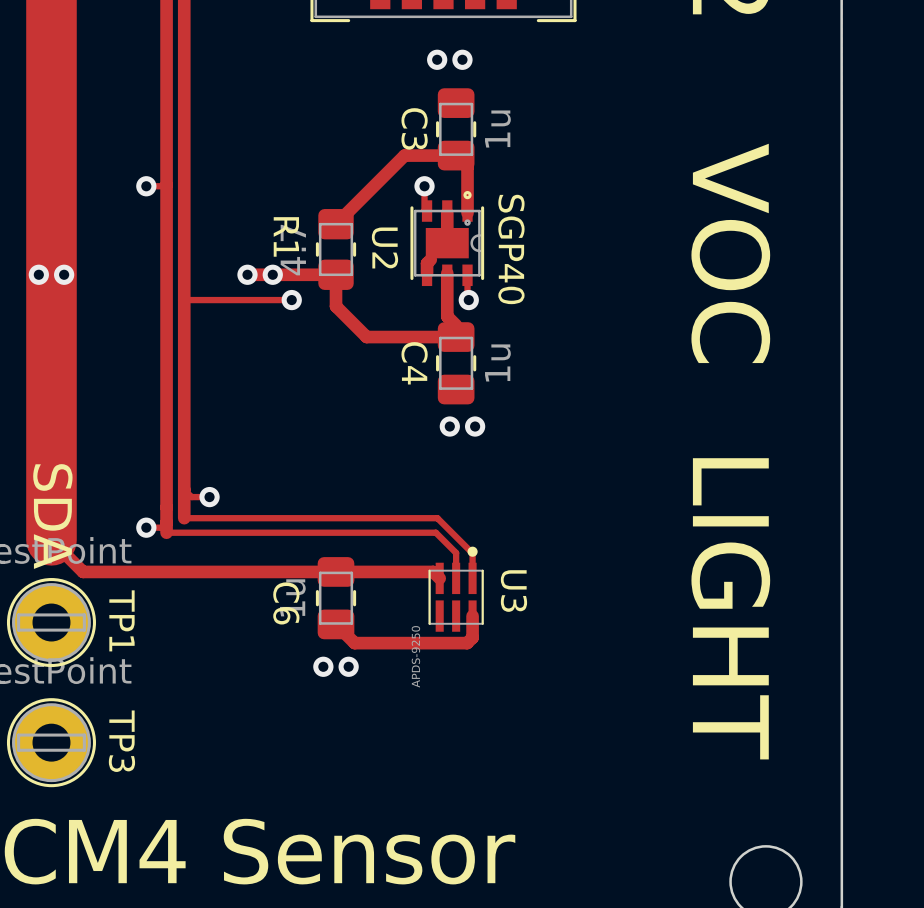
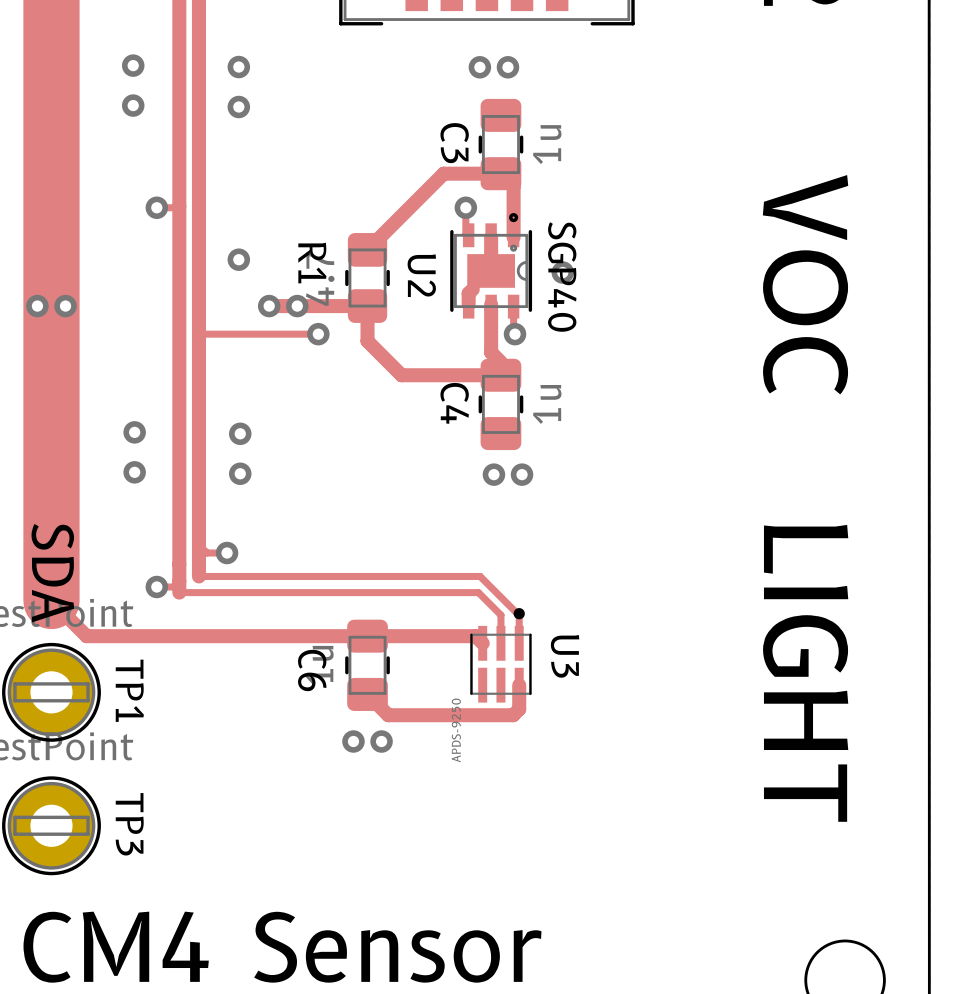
via: none -> (133, 65)
via: none -> (238, 67)
via: none -> (133, 105)
via: none -> (238, 107)
via: none -> (238, 259)
via: none -> (562, 272)
via: none -> (134, 432)
via: none -> (240, 433)
via: none -> (134, 472)
via: none -> (240, 473)

